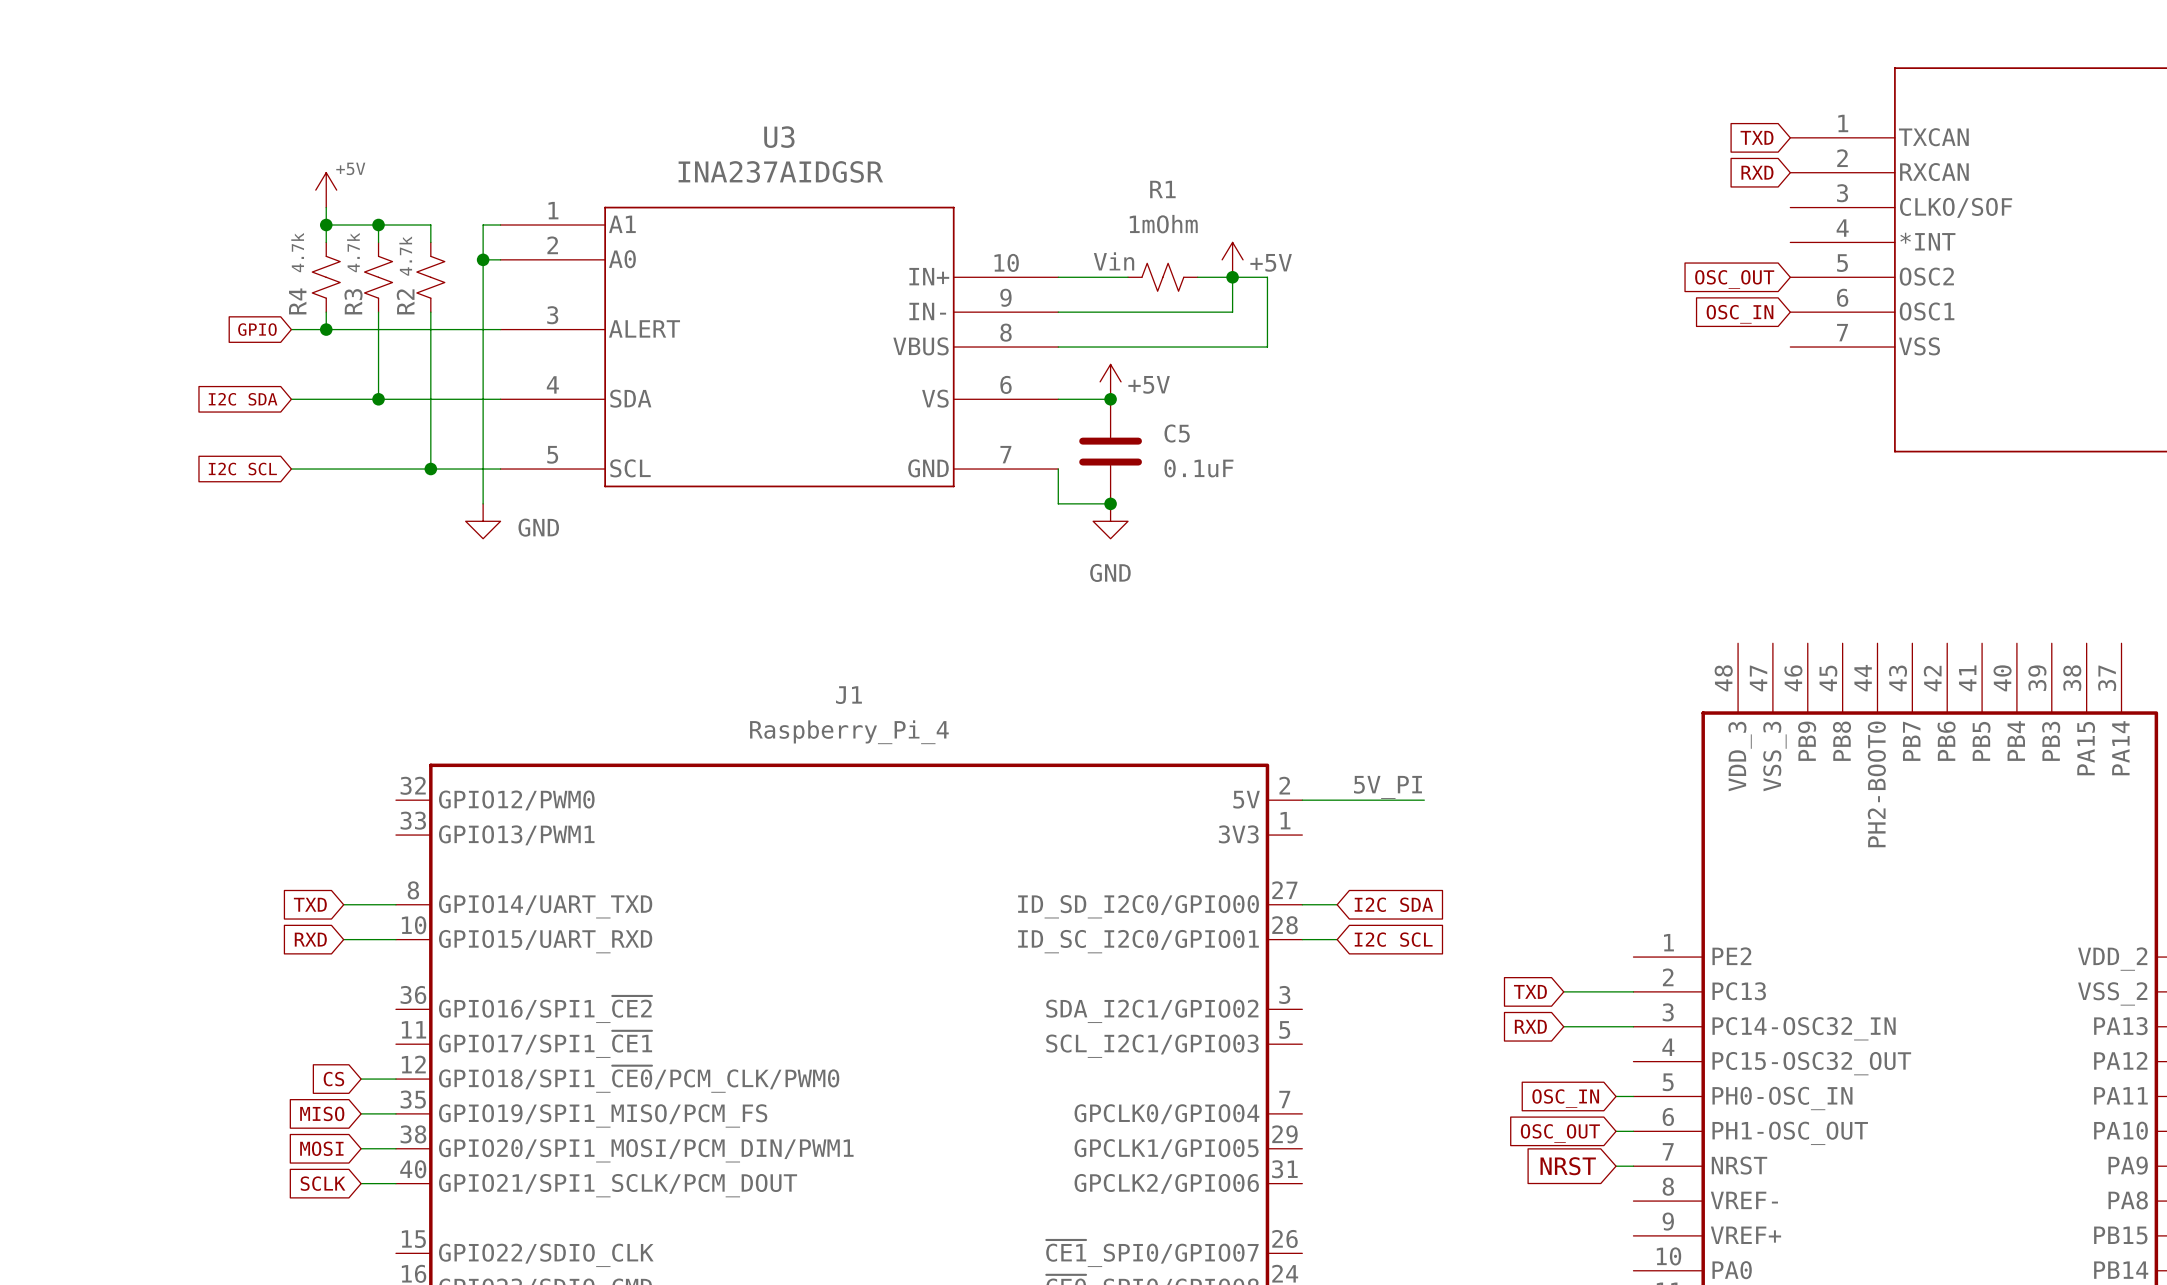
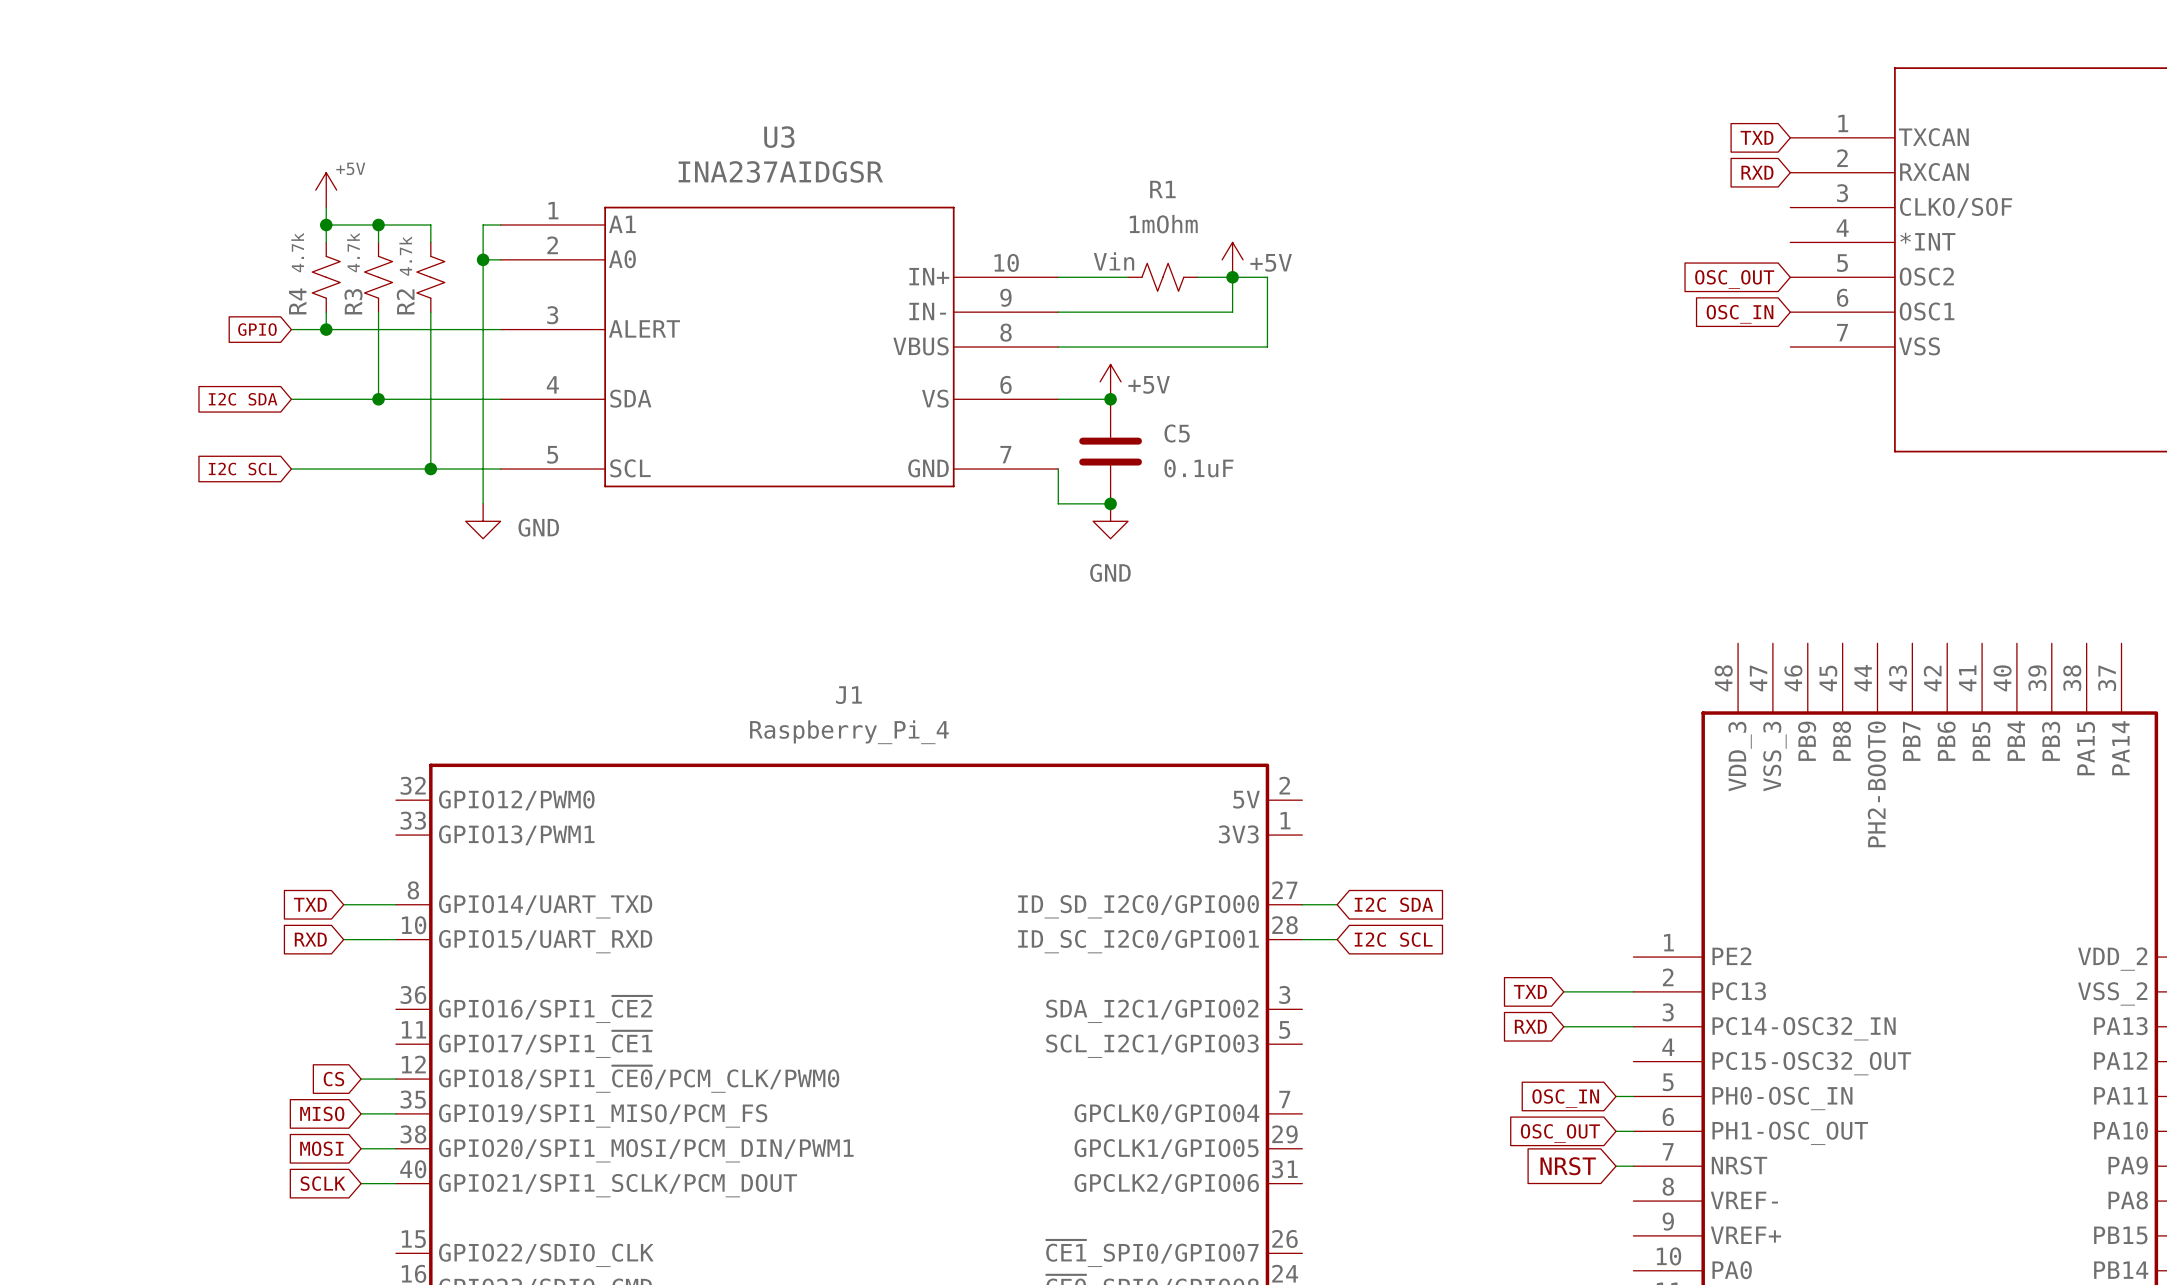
label: 5V_PI (1387, 787) -> none
wire: (1302, 800) (1424, 800) -> none

